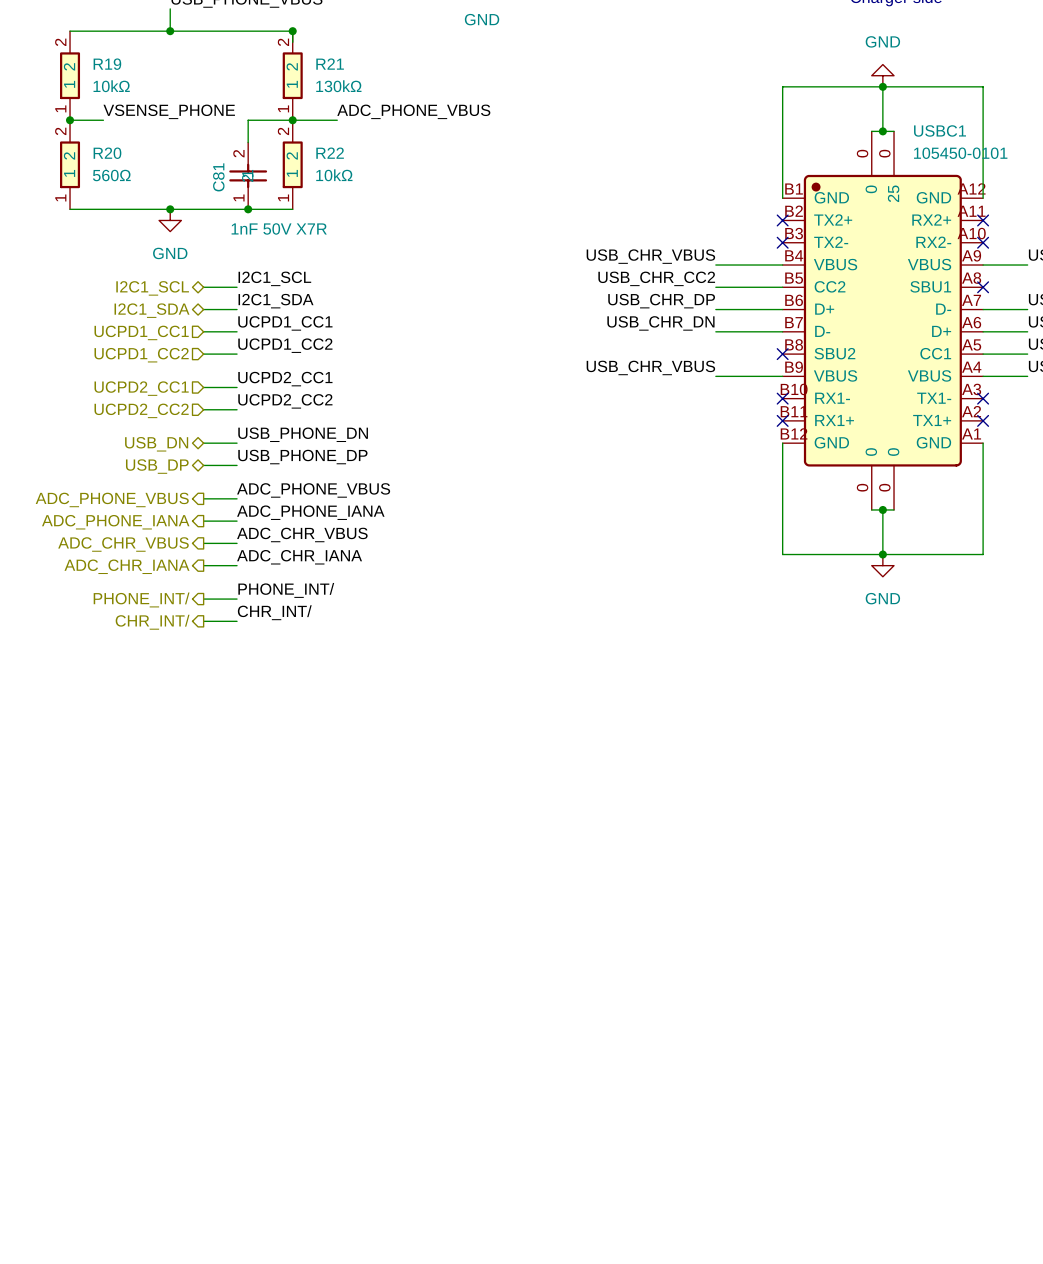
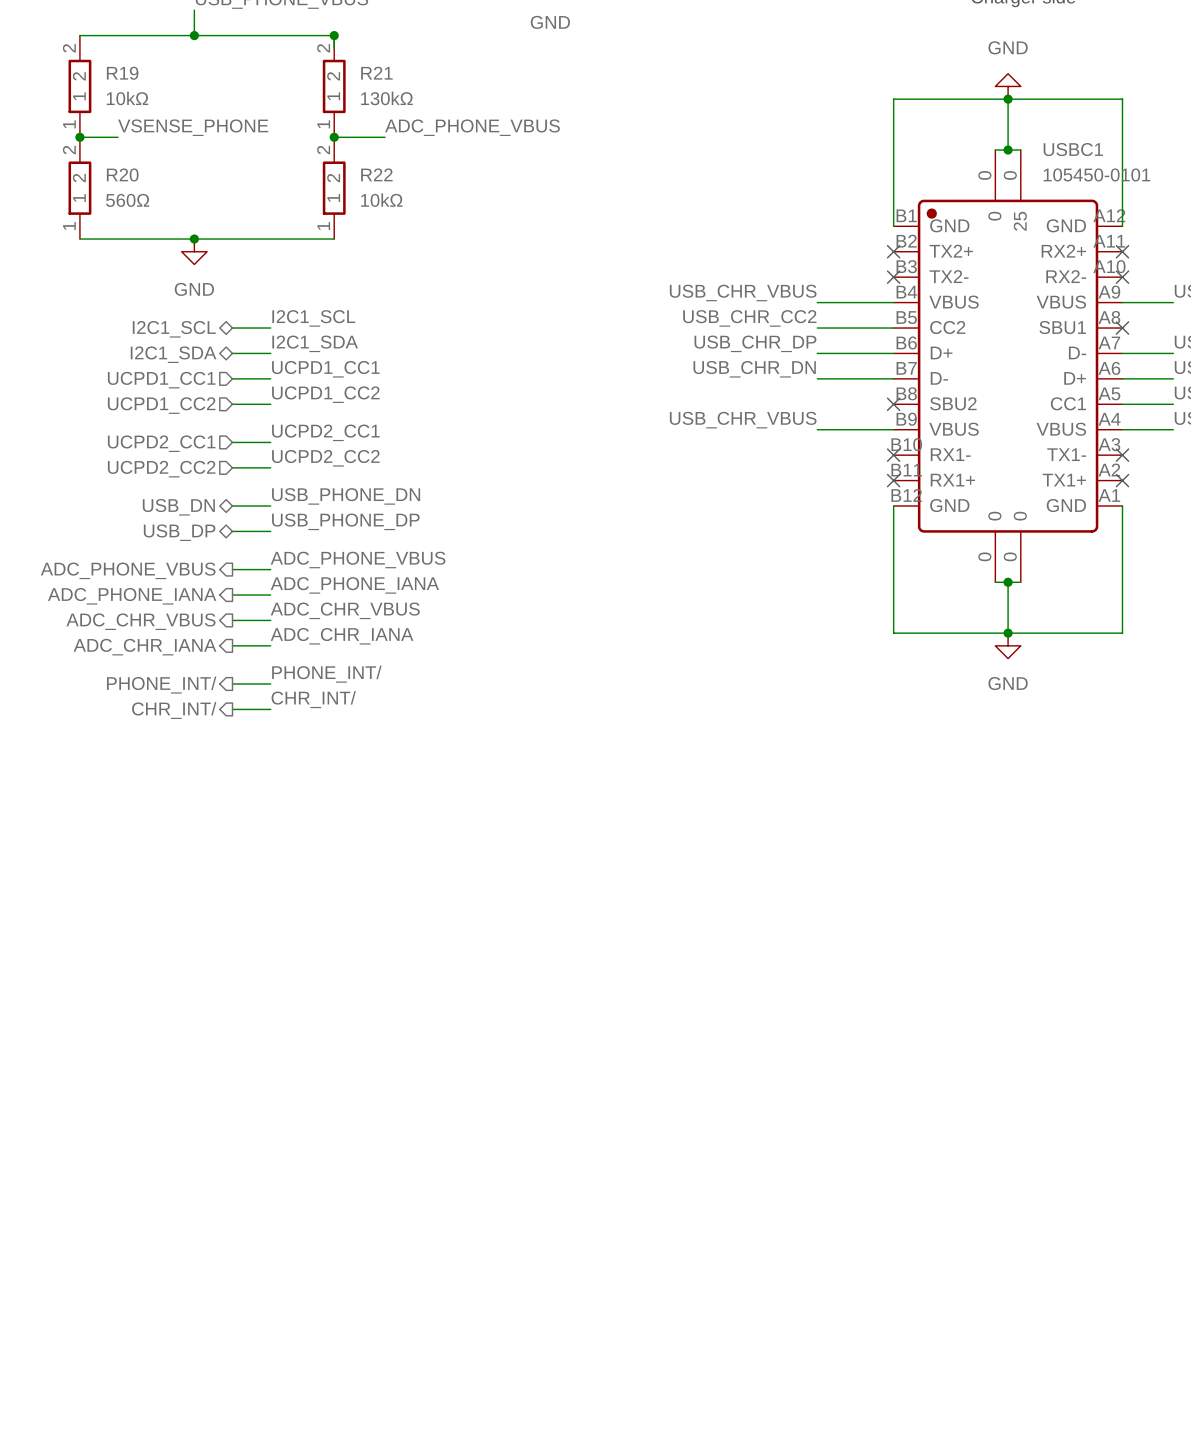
wire: (292, 120) (248, 120) (248, 142) -> none
C81: 1nF 50V X7R (248, 175) -> none
junction: (248, 209) -> none

